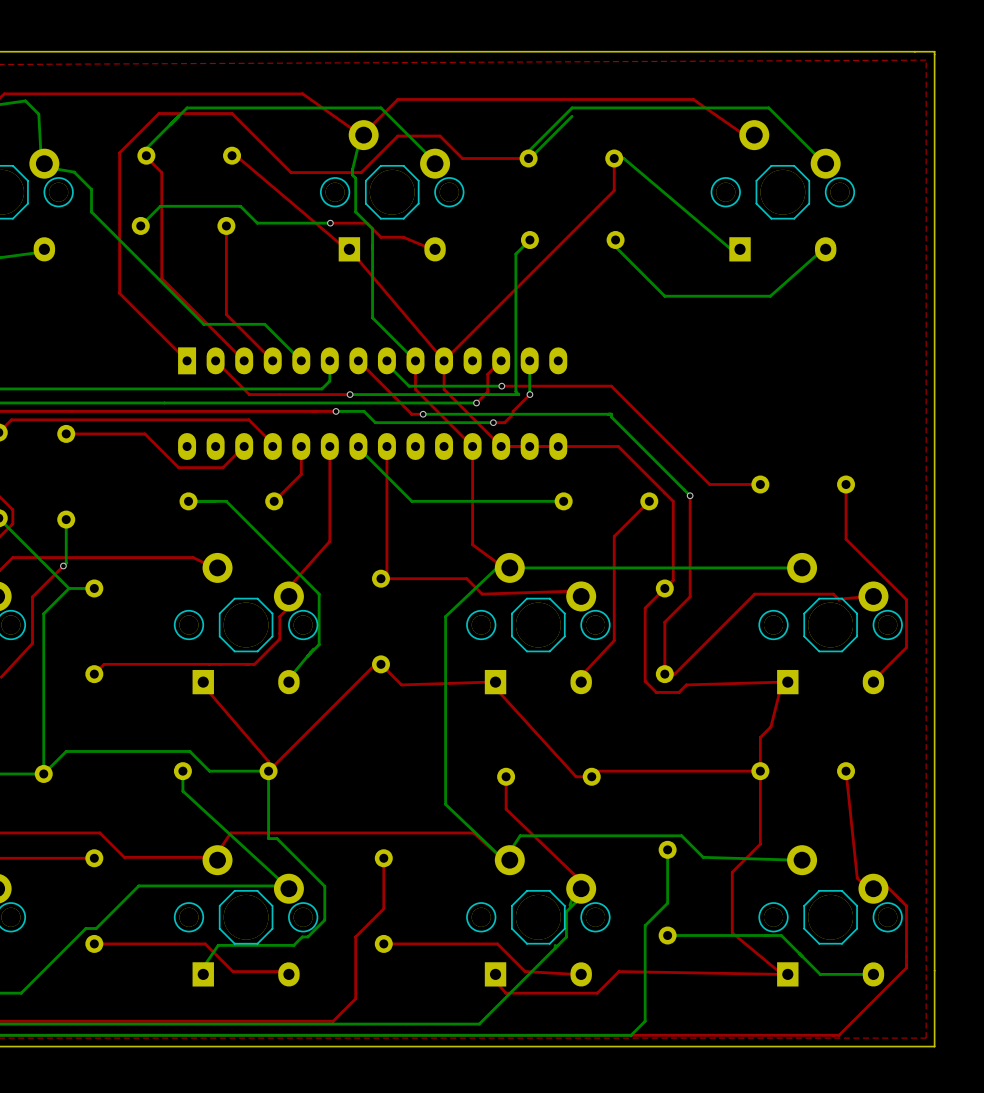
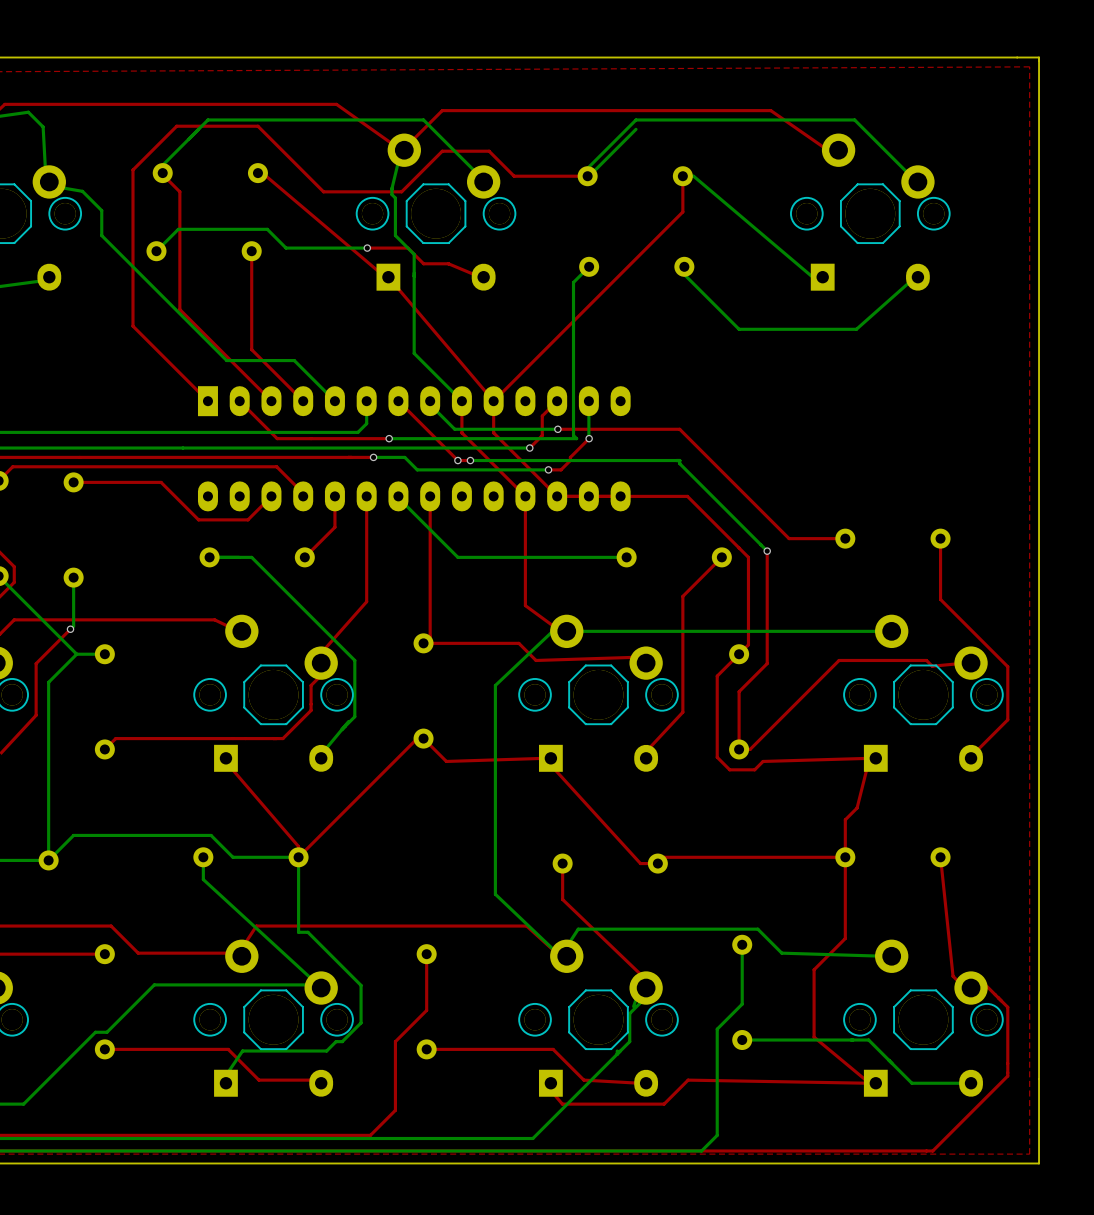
via: none -> (457, 460)

